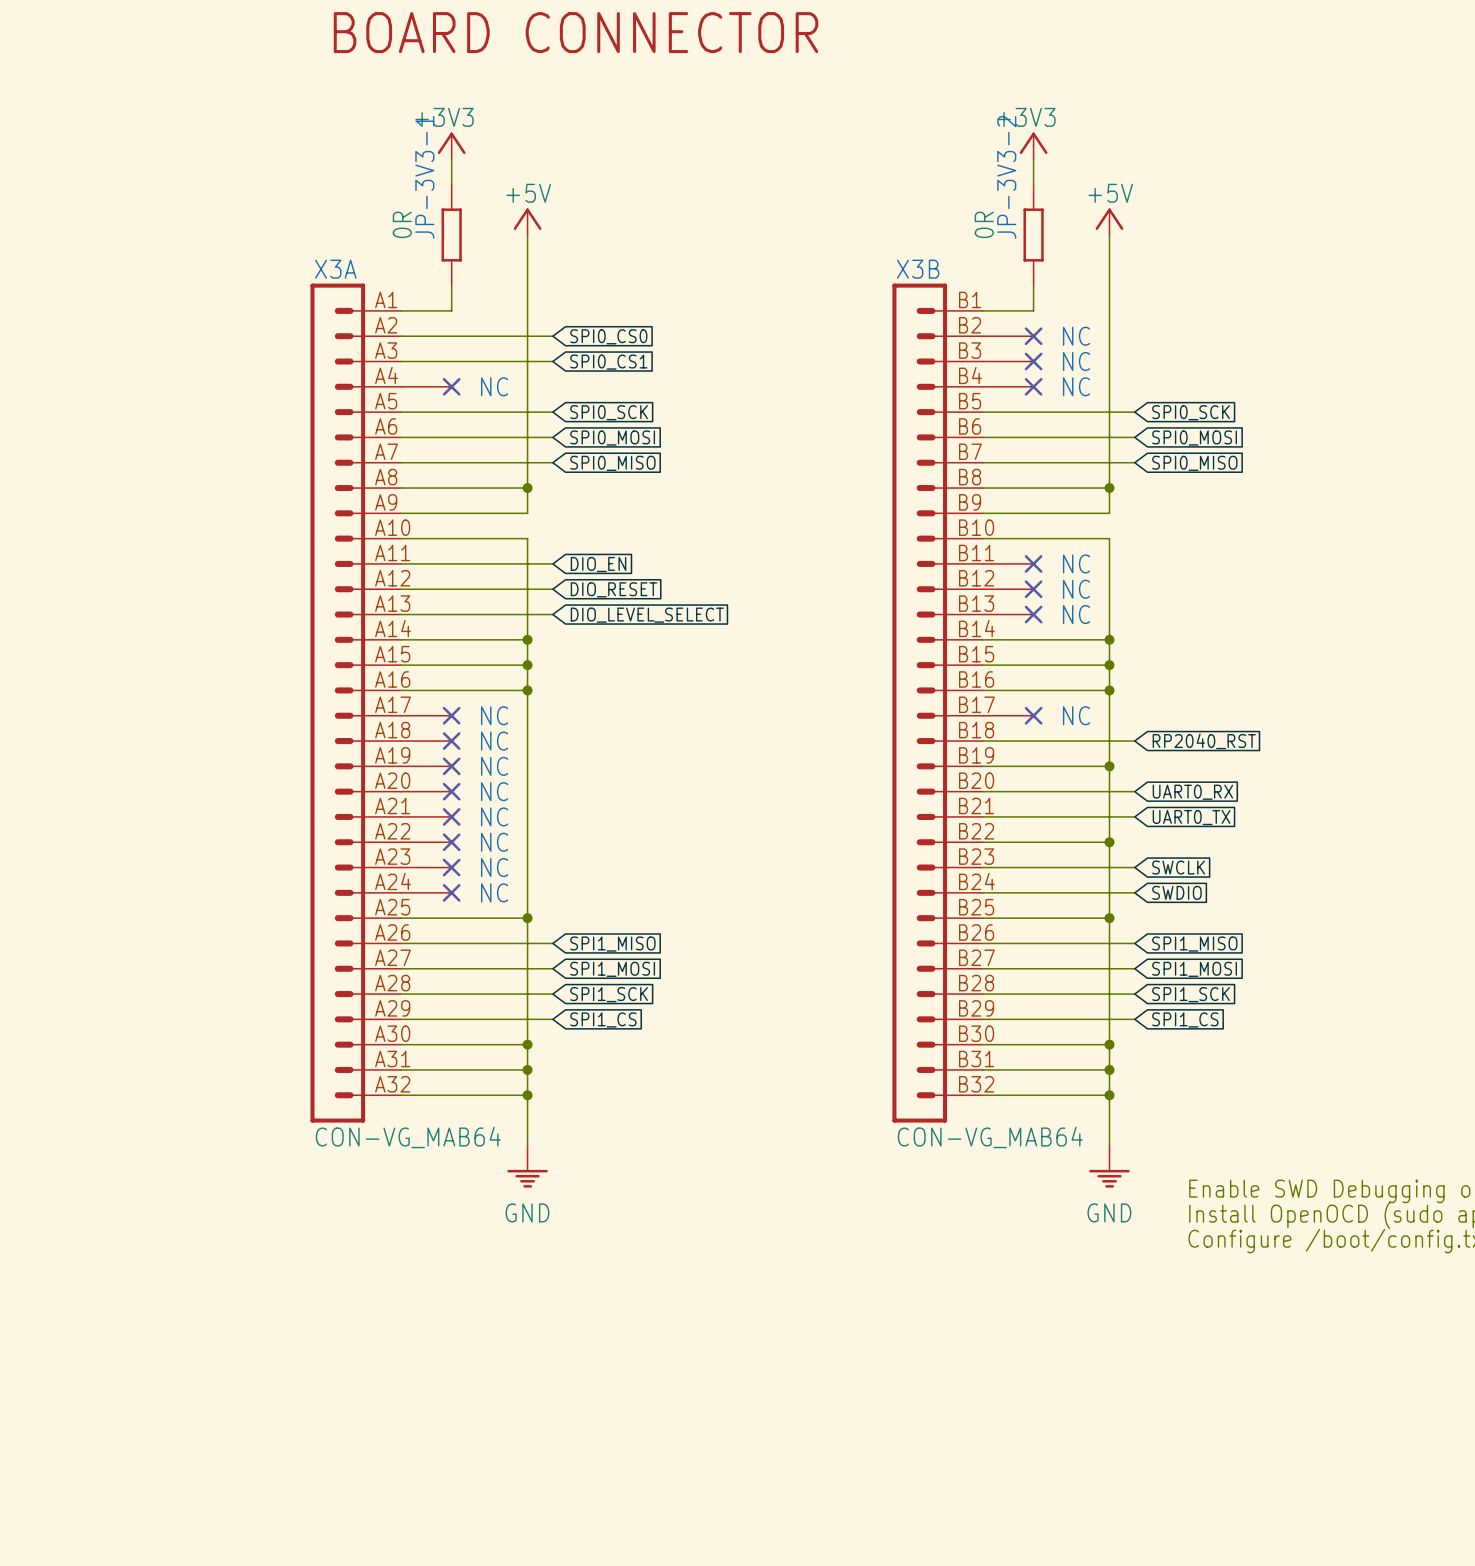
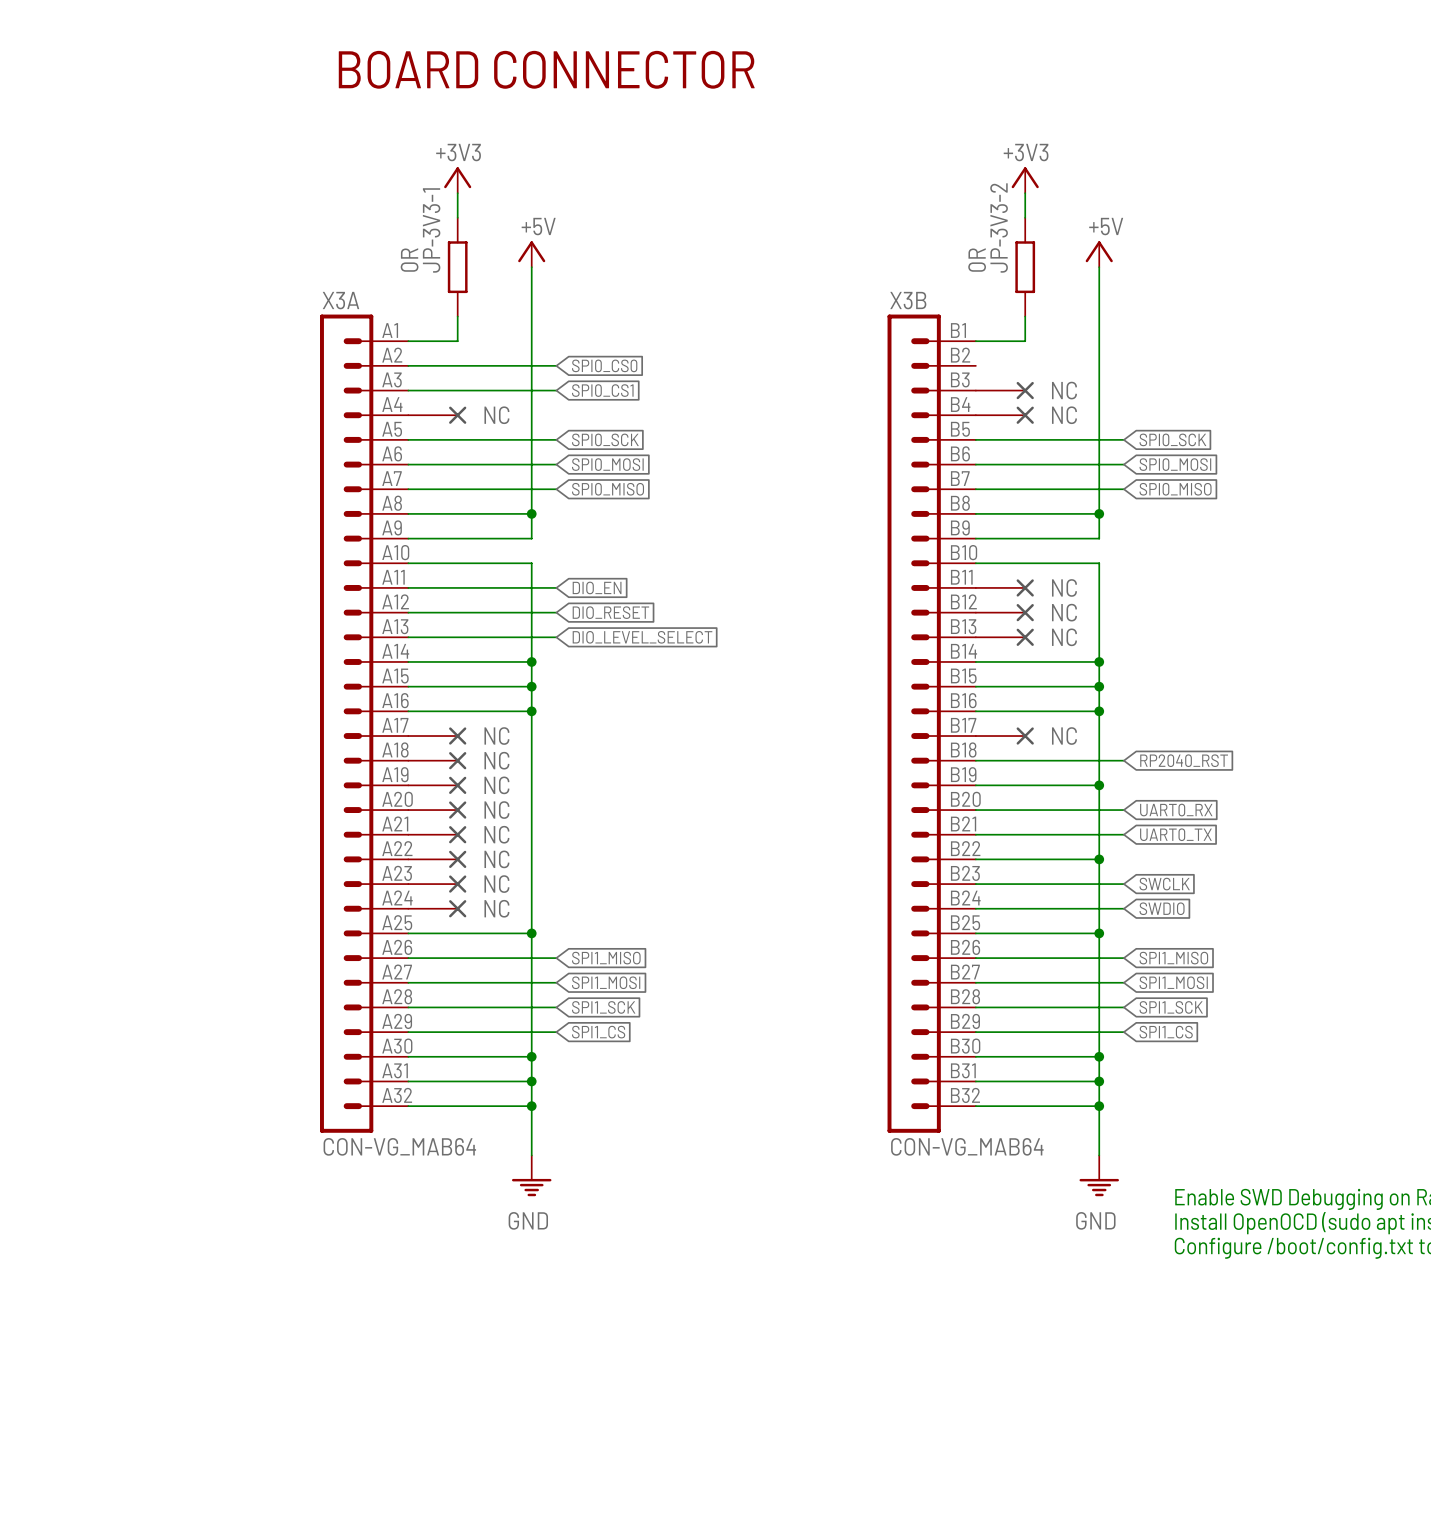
part: (1012, 336) -> none

